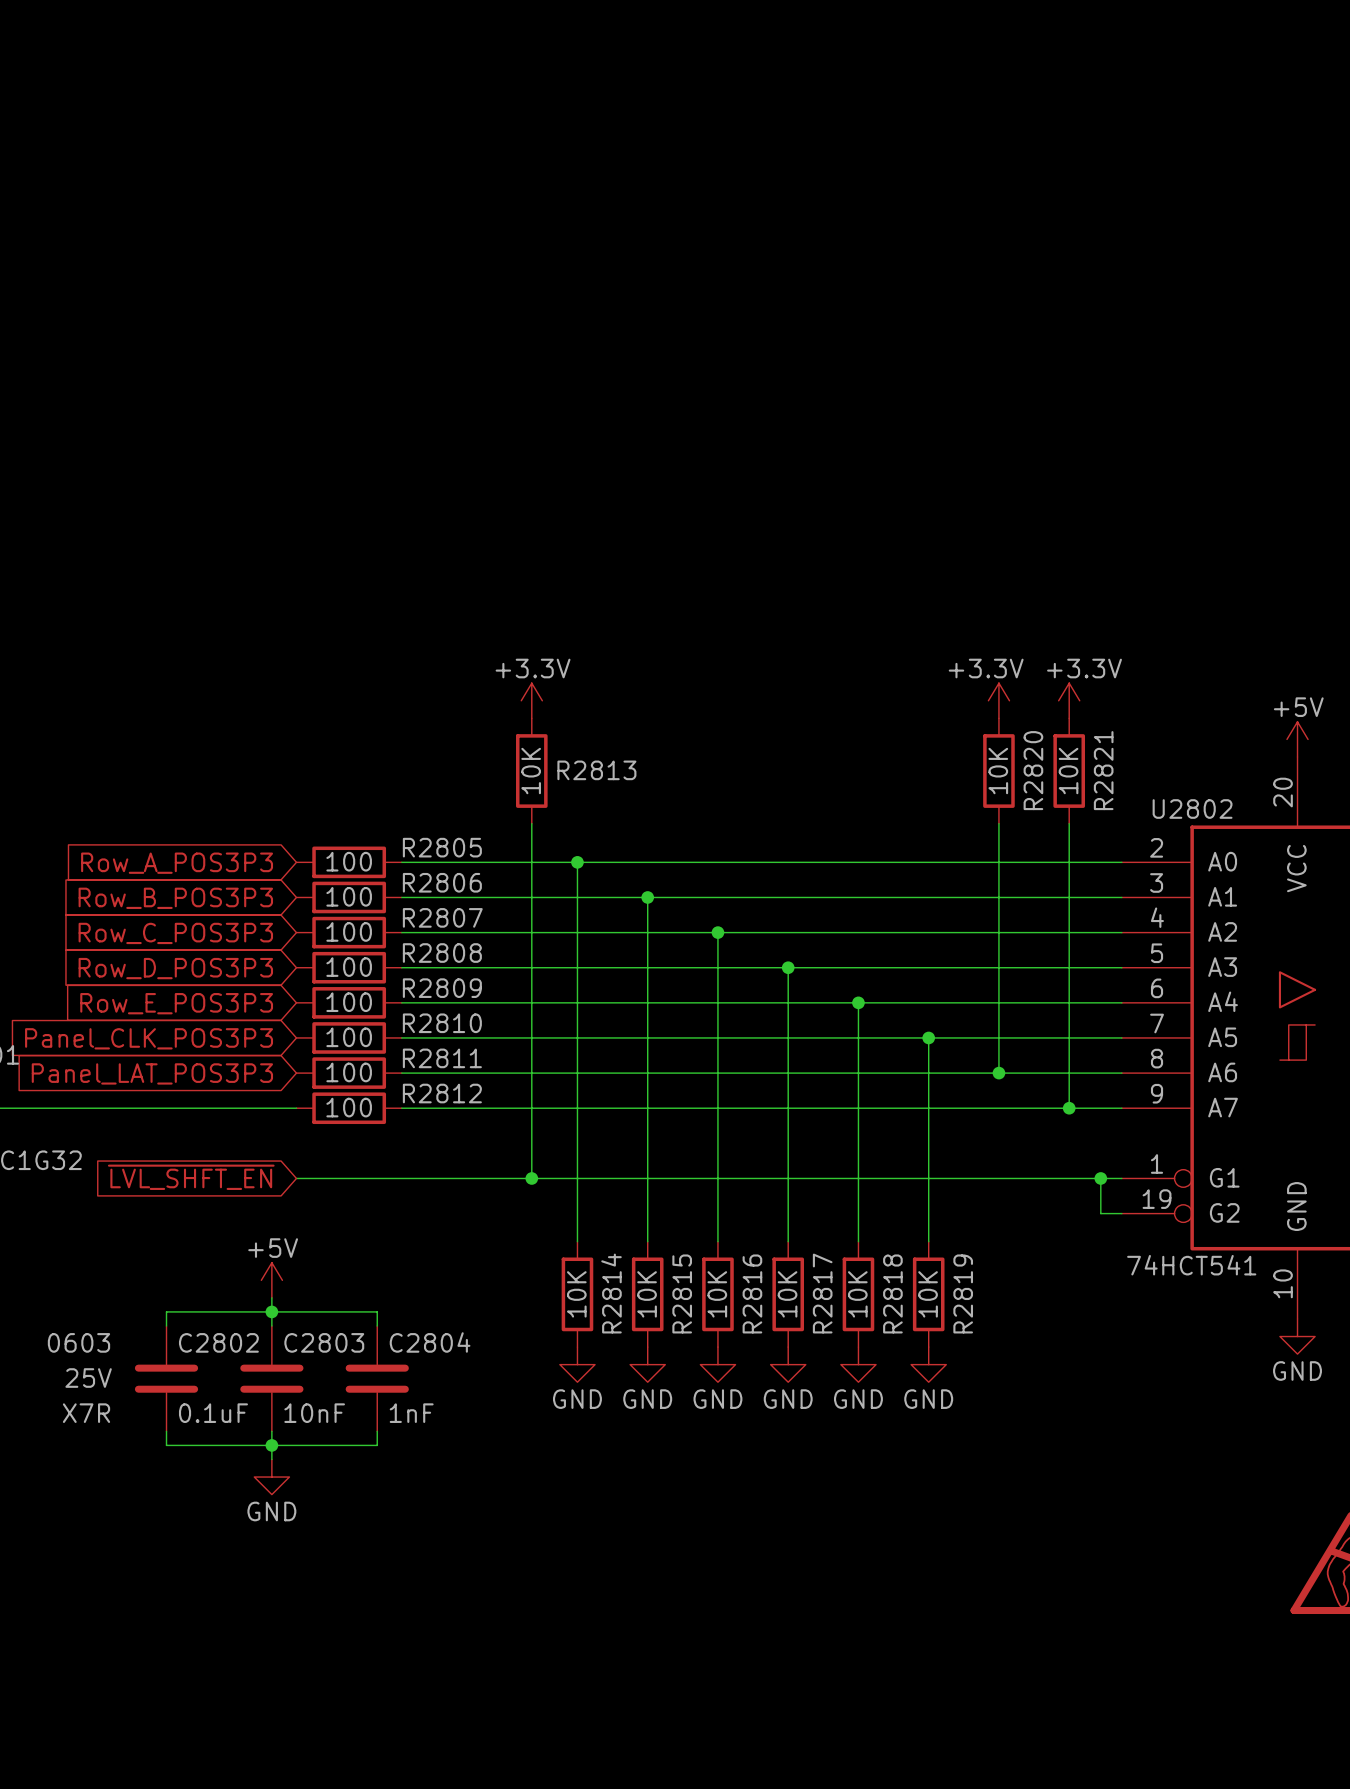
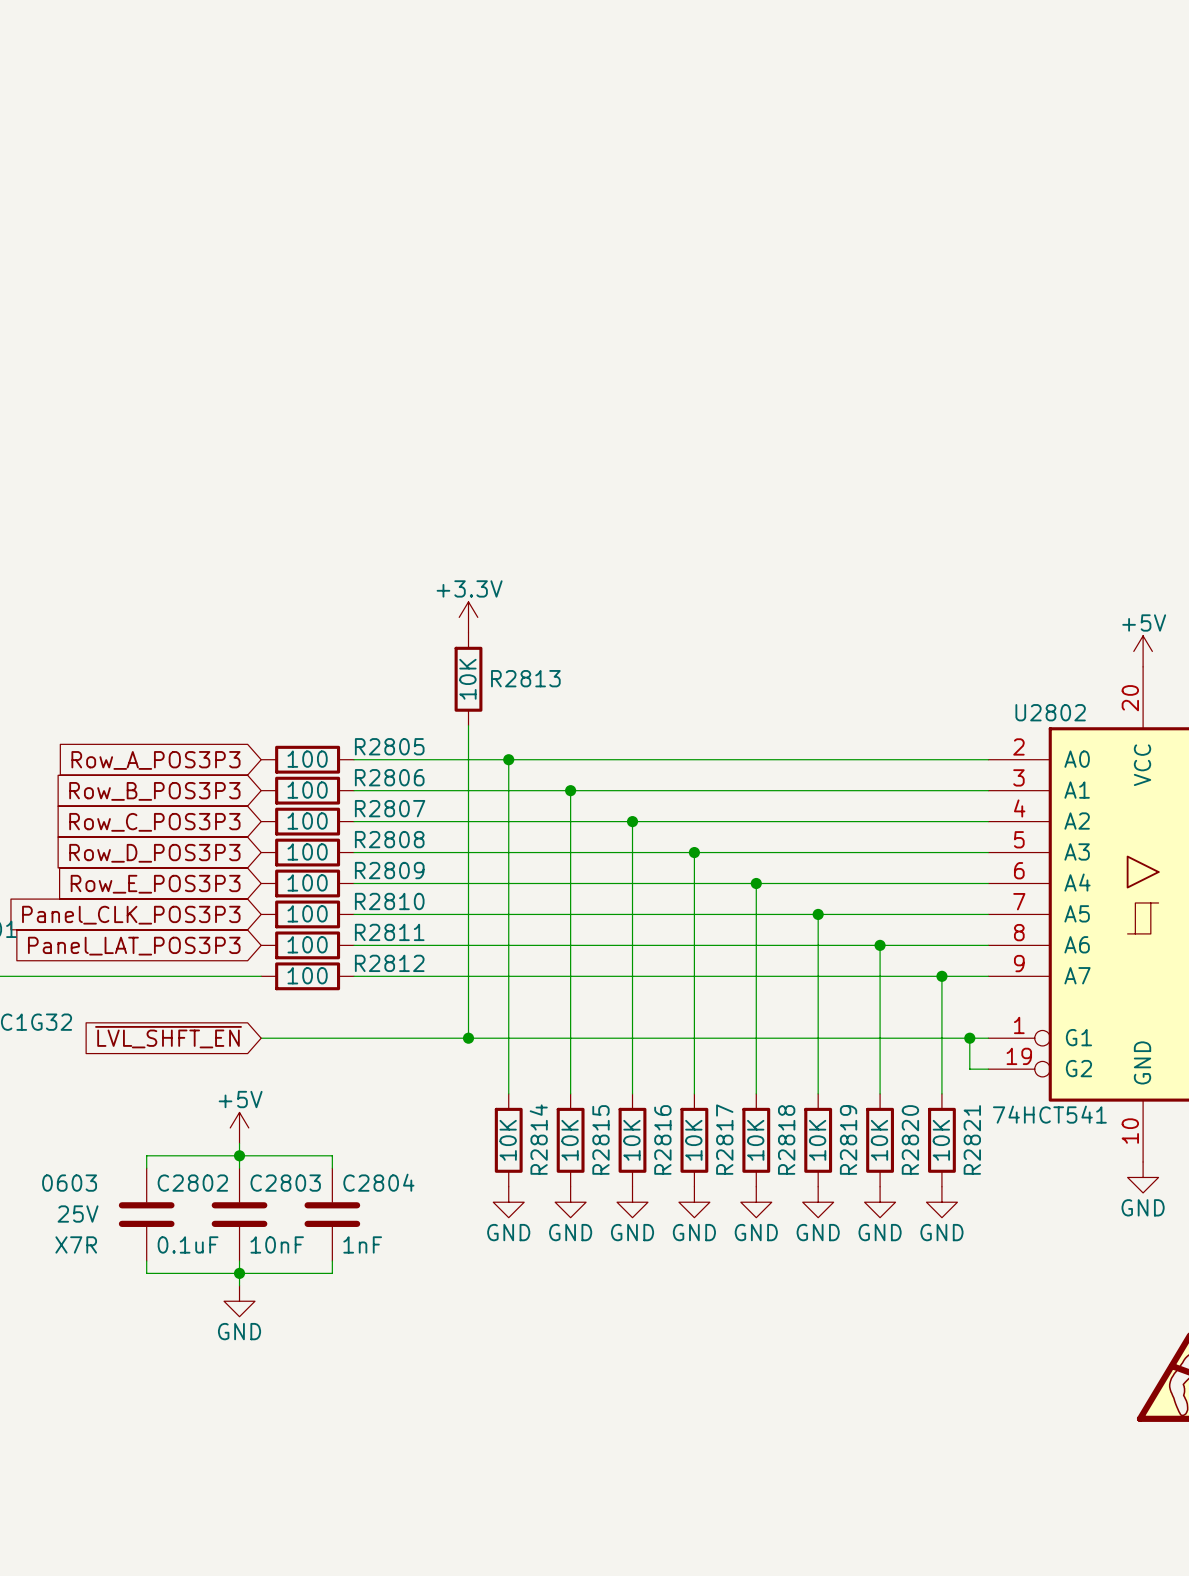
power symbol: +3.3V (998, 700) -> none
power symbol: +3.3V (1069, 700) -> none
R2820 position: (998, 771) -> (880, 1140)
R2821 position: (1069, 771) -> (941, 1140)
wire: (998, 823) (998, 1073) -> (880, 1093) (880, 945)
wire: (1069, 823) (1069, 1108) -> (941, 1093) (941, 976)
power symbol: none -> GND (880, 1202)
power symbol: none -> GND (941, 1202)

